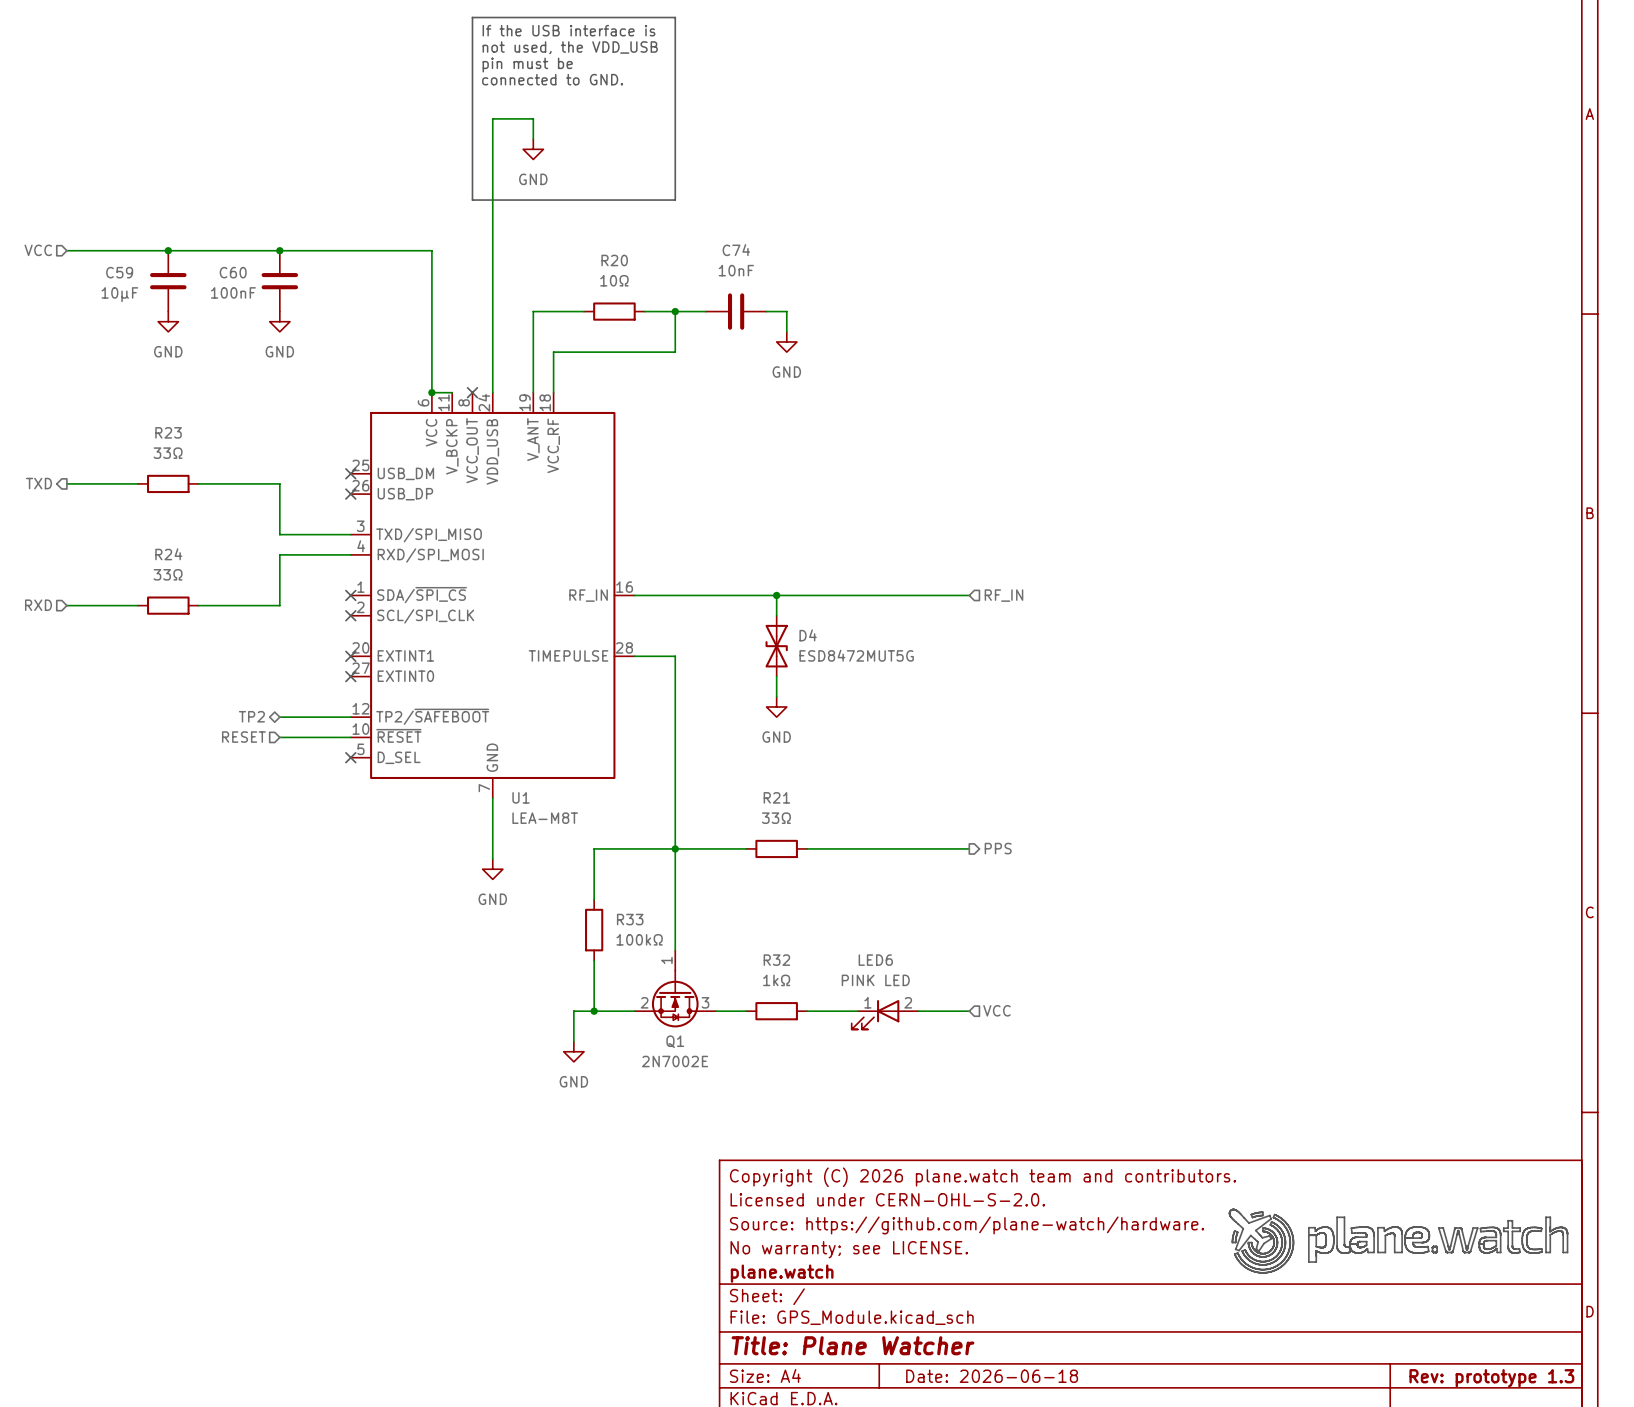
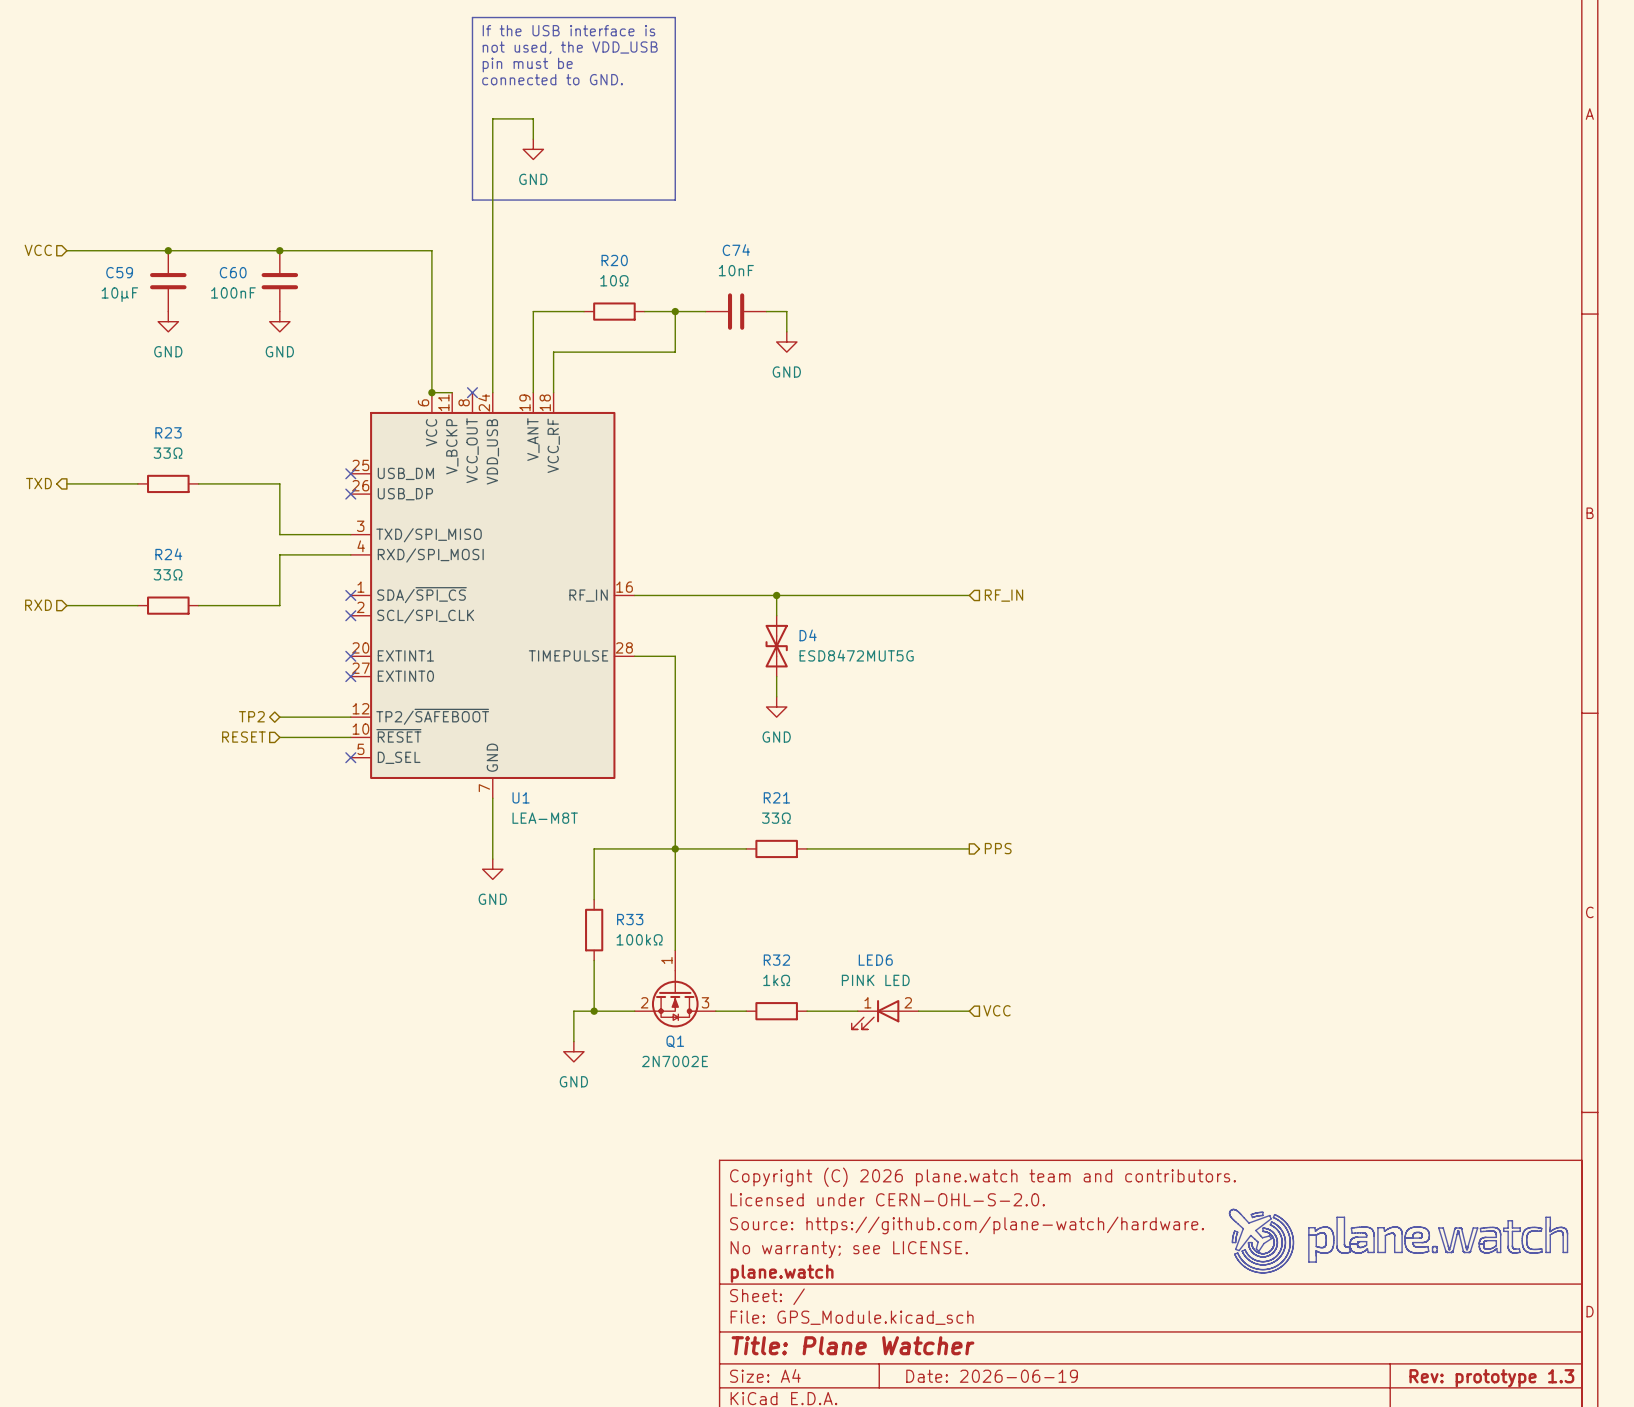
title block: Date: 2026-06-18 (992, 1376) -> Date: 2026-06-19 (992, 1376)

